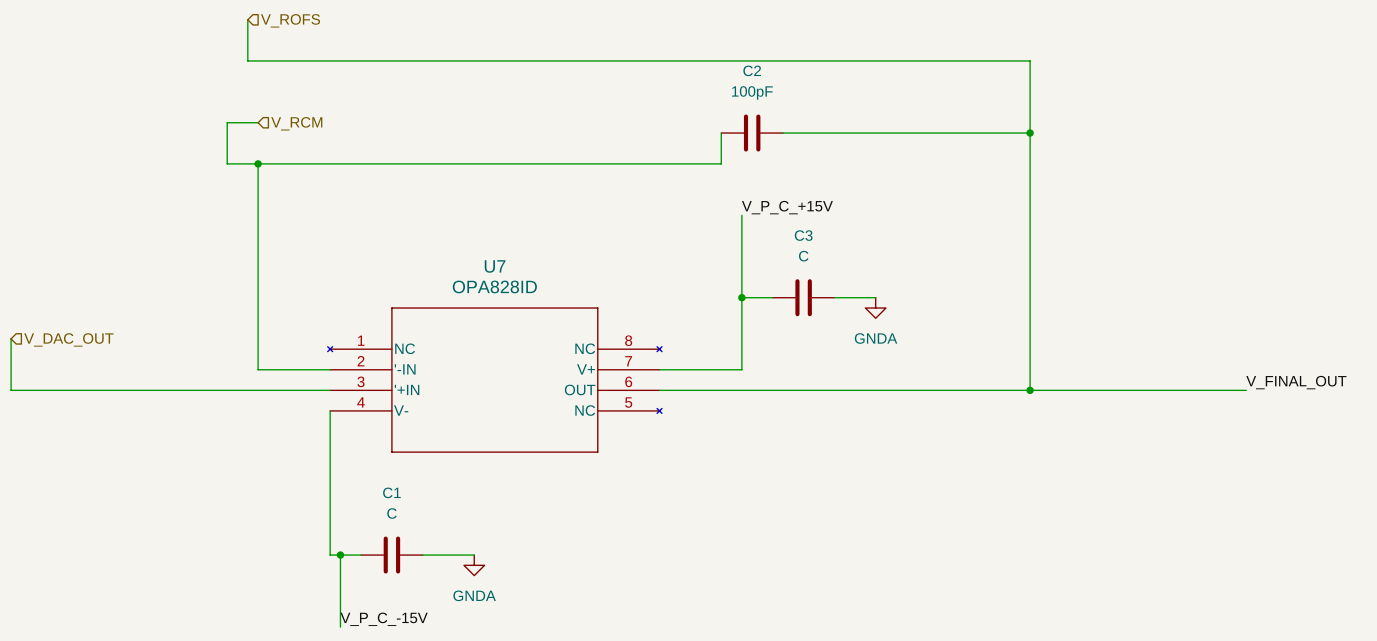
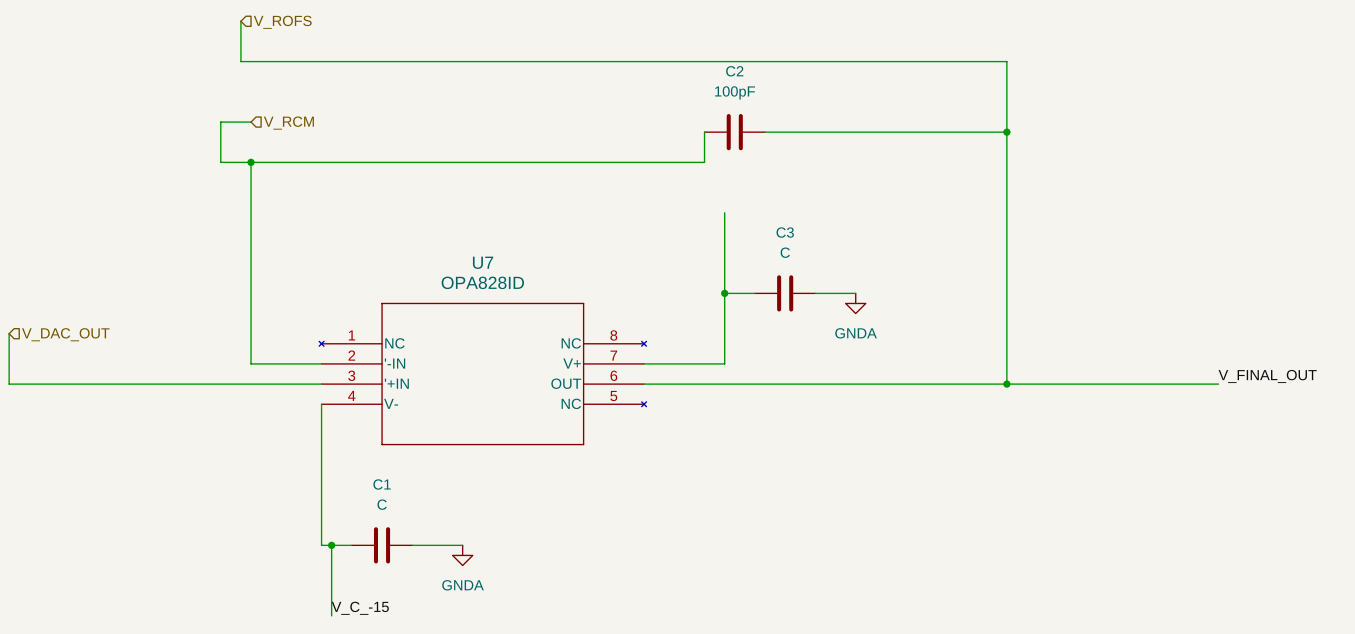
label: V_P_C_+15V (787, 207) -> none
label: V_P_C_-15V (384, 619) -> V_C_-15 (360, 608)

